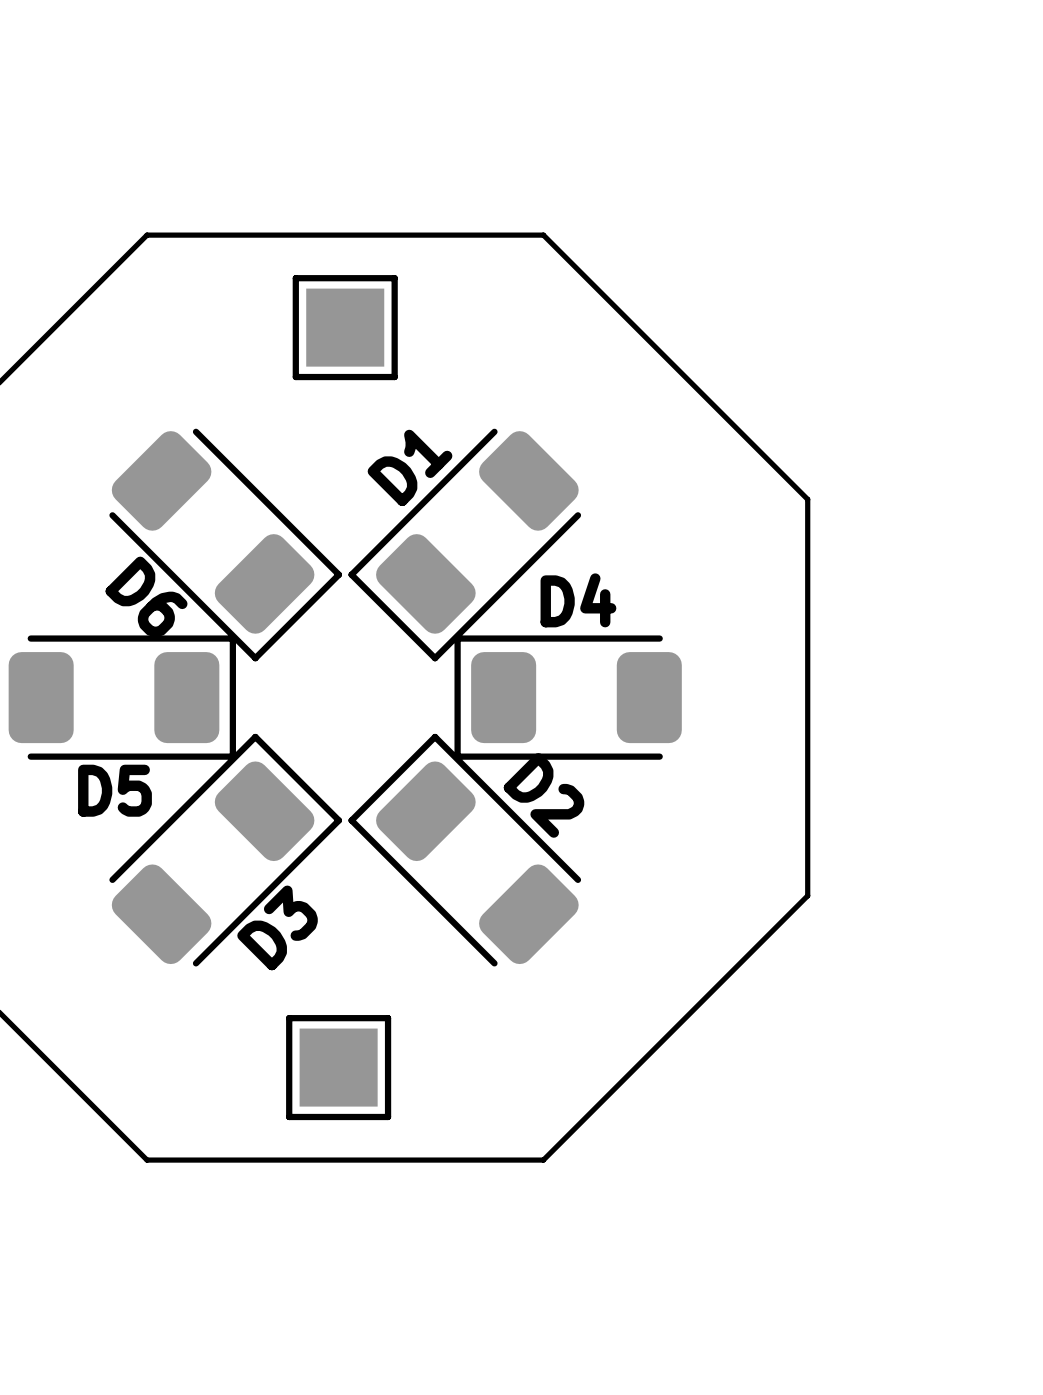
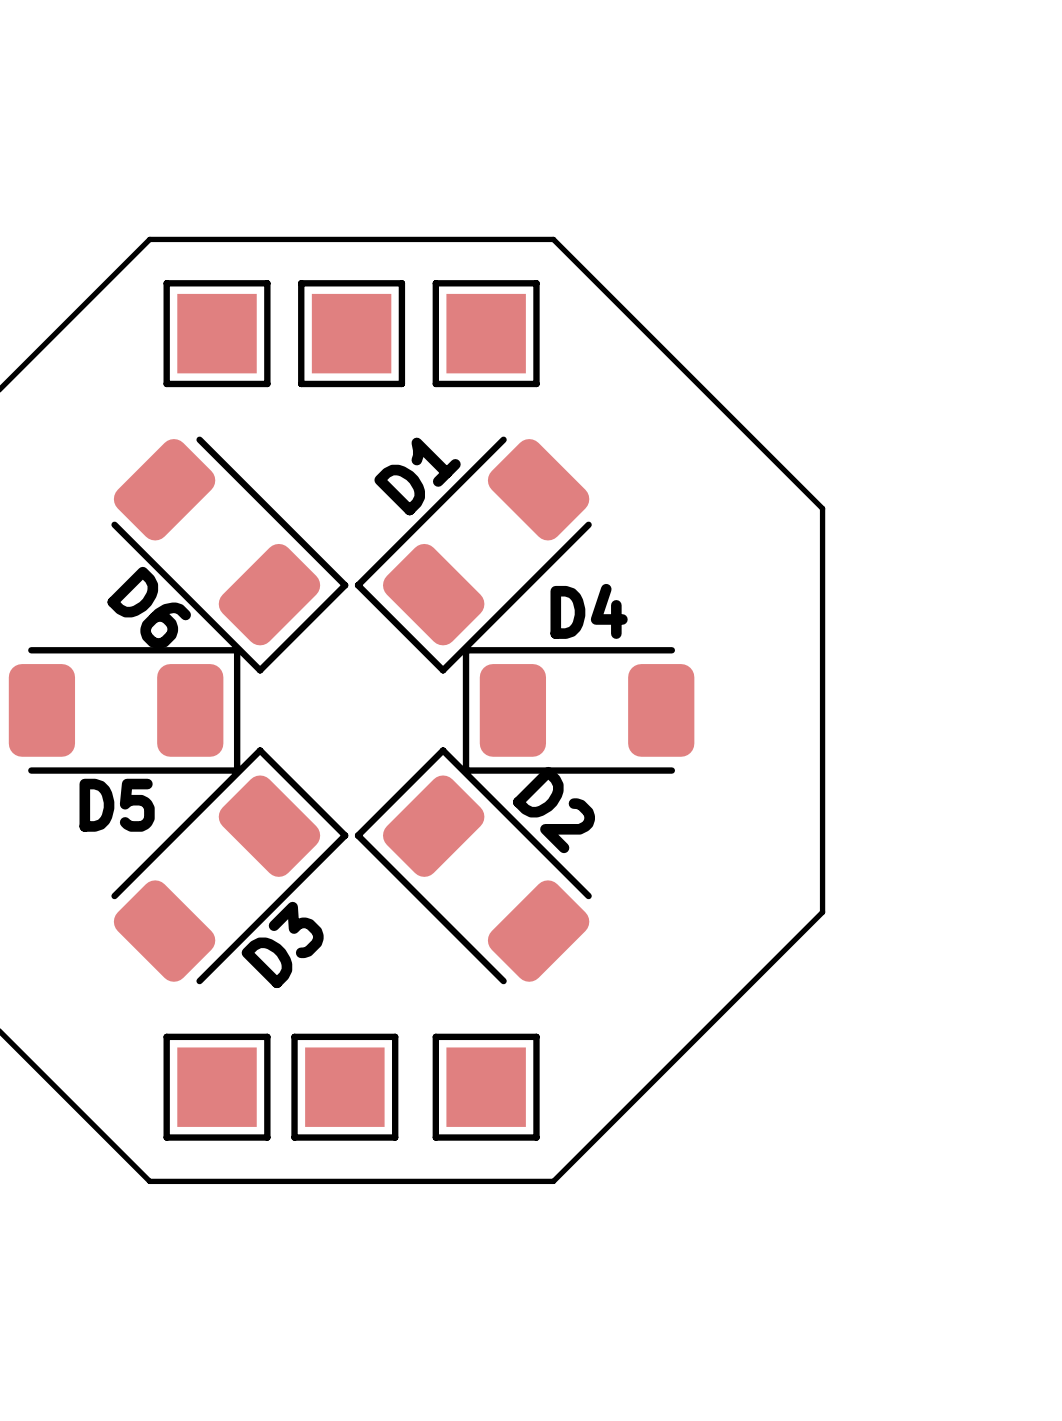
part: none -> (217, 333)
part: none -> (486, 333)
part: none -> (217, 1087)
part: none -> (486, 1087)

